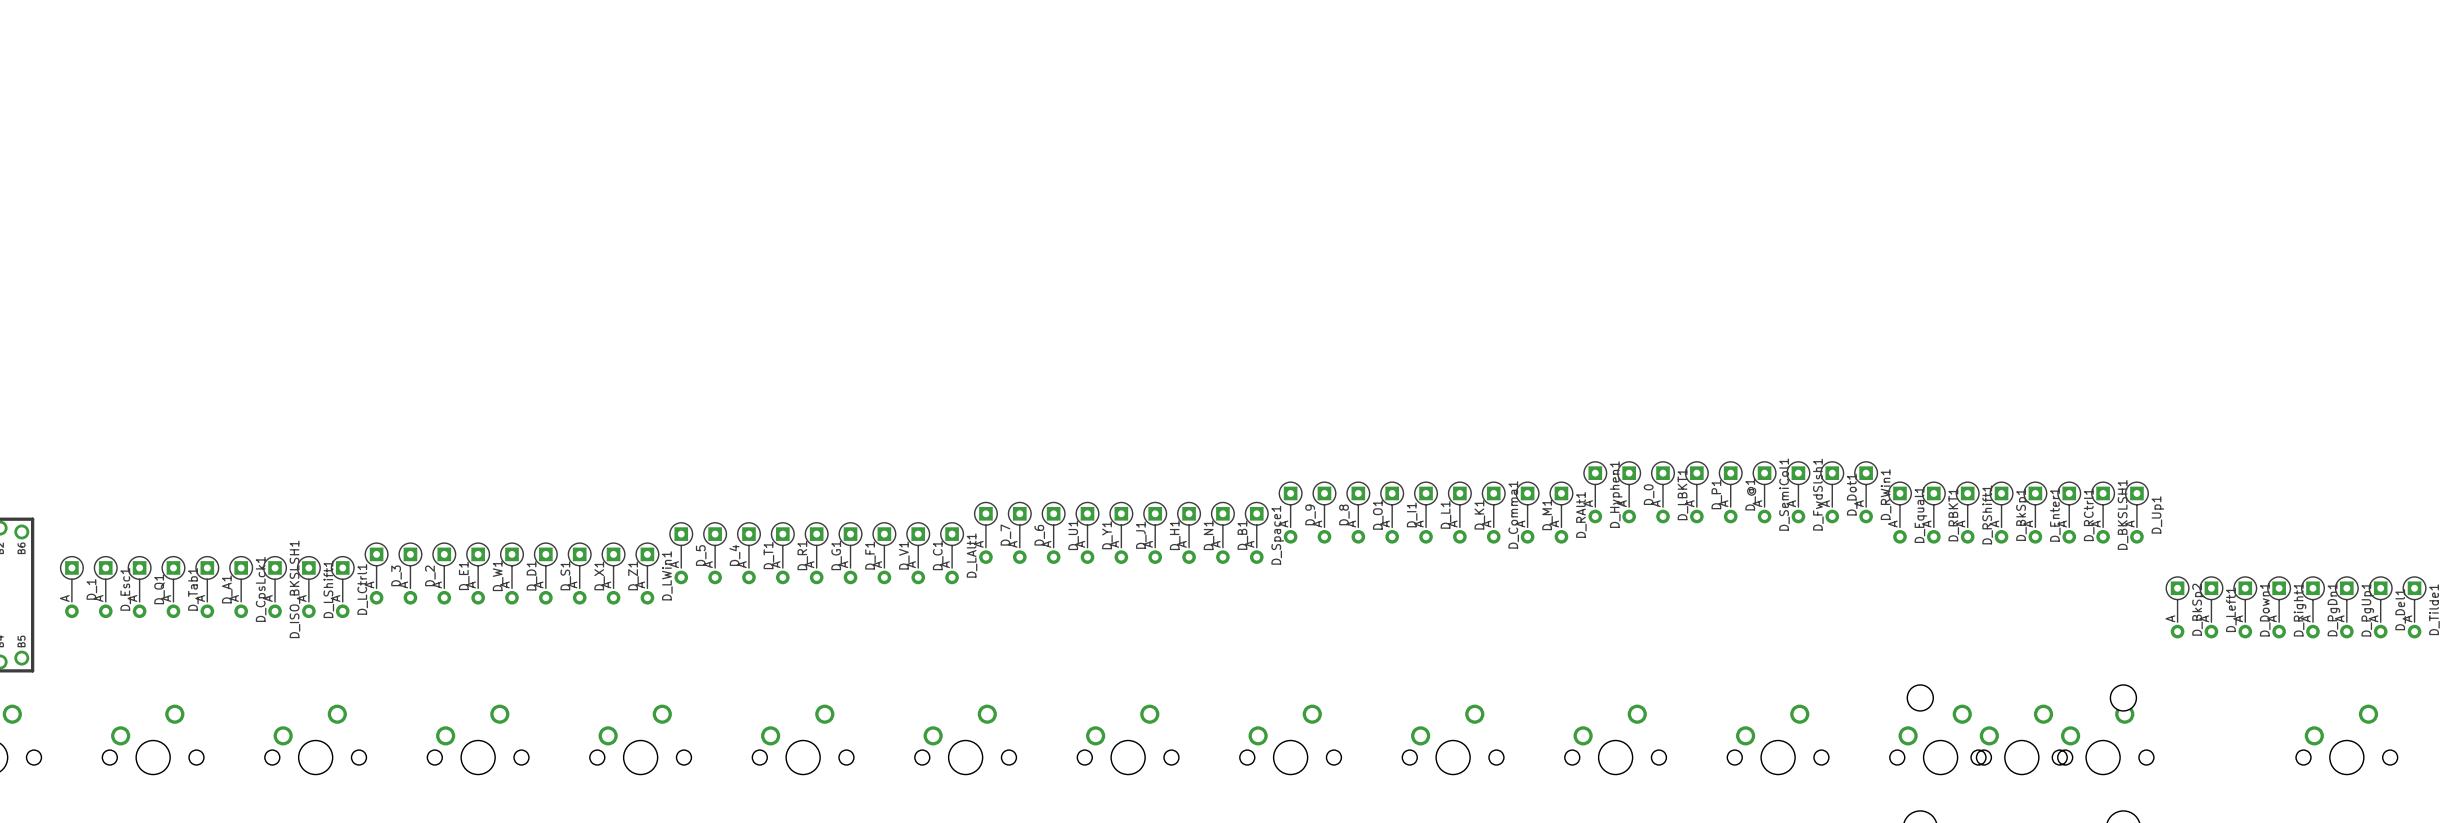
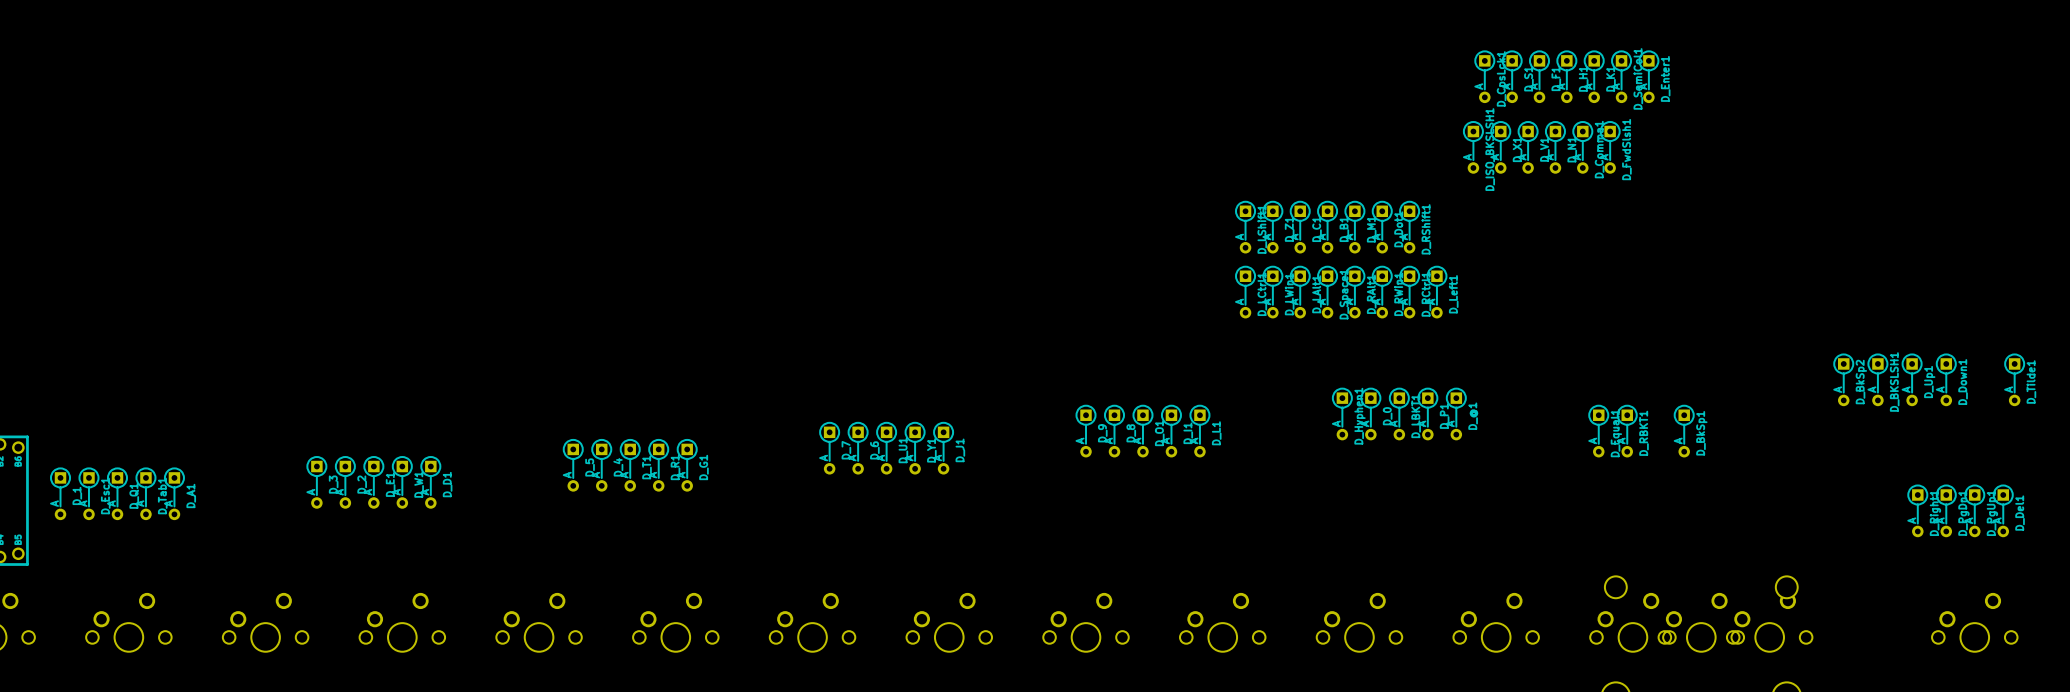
D_SemiCol1 position: (1764, 492) -> (1621, 77)
D_FwdSlsh1 position: (1798, 492) -> (1610, 147)
D_Dot1 position: (1832, 492) -> (1382, 227)
D_RWin1 position: (1866, 492) -> (1382, 292)
D_K1 position: (1459, 512) -> (1594, 77)
D_Comma1 position: (1493, 512) -> (1582, 147)
D_M1 position: (1527, 512) -> (1354, 227)
D_RAlt1 position: (1561, 512) -> (1354, 292)
D_RShift1 position: (1967, 512) -> (1409, 227)
D_Enter1 position: (2035, 512) -> (1648, 77)
D_RCtrl1 position: (2069, 512) -> (1409, 292)
D_BKSLSH1 position: (2103, 512) -> (1877, 380)
D_Up1 position: (2136, 512) -> (1912, 380)
D_H1 position: (1155, 532) -> (1566, 77)
D_N1 position: (1189, 532) -> (1555, 147)
D_B1 position: (1222, 532) -> (1327, 227)
D_Space1 position: (1256, 532) -> (1327, 292)
D_F1 position: (850, 553) -> (1539, 77)
D_V1 position: (884, 553) -> (1528, 147)
D_C1 position: (918, 553) -> (1300, 227)
D_LAlt1 position: (952, 553) -> (1300, 292)
D_S1 position: (545, 573) -> (1512, 77)
D_X1 position: (579, 573) -> (1500, 147)
D_Z1 position: (613, 573) -> (1272, 227)
D_LWin1 position: (647, 573) -> (1272, 292)
D_CpsLck1 position: (241, 587) -> (1484, 77)
D_ISO_BKSLSH1 position: (275, 587) -> (1473, 147)
D_LShift1 position: (308, 587) -> (1245, 227)
D_LCtrl1 position: (342, 587) -> (1245, 292)
D_BkSp2 position: (2177, 607) -> (1843, 380)
D_Left1 position: (2211, 607) -> (1436, 292)
D_Down1 position: (2245, 607) -> (1946, 380)
D_Tilde1 position: (2414, 607) -> (2014, 380)

